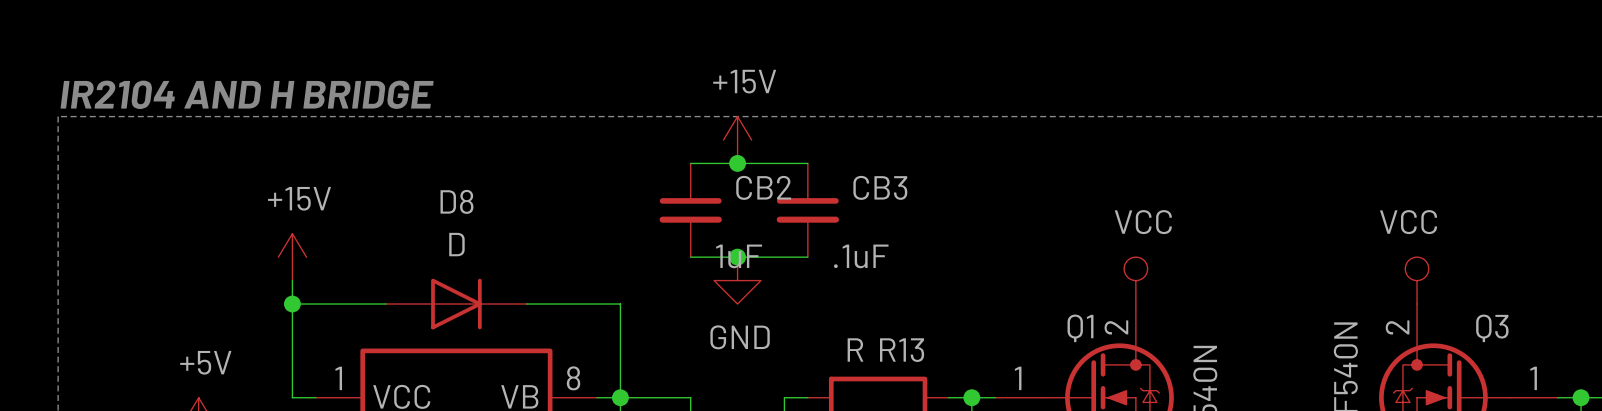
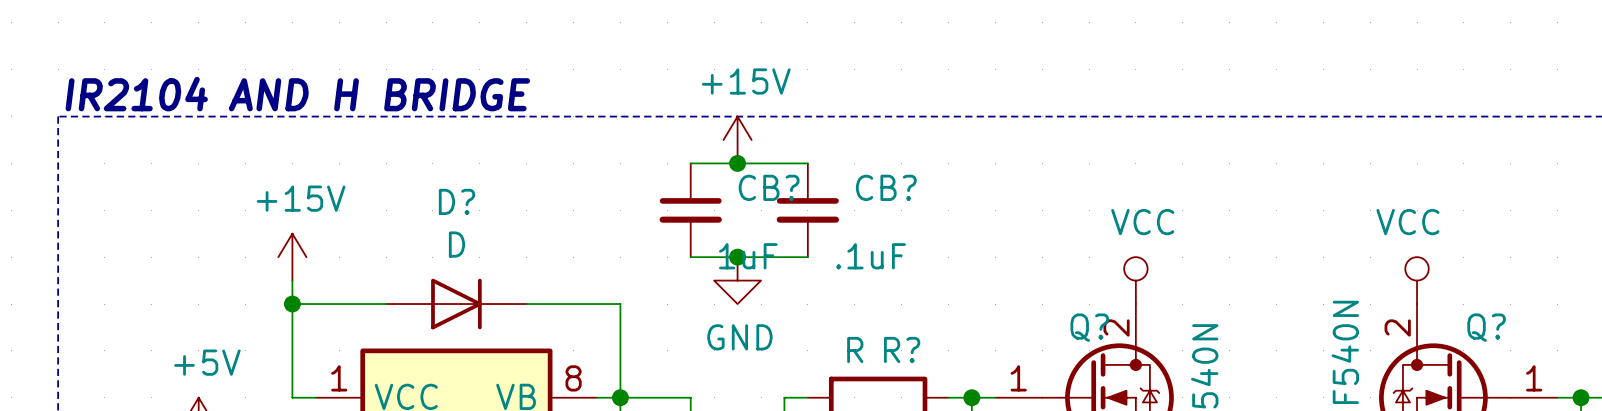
CB2 name: CB2 (763, 187) -> CB? (769, 187)
CB3 name: CB3 (880, 187) -> CB? (886, 187)
D8 name: D8 (456, 201) -> D? (456, 201)
Q1 name: Q1 (1080, 328) -> Q? (1089, 327)
Q3 name: Q3 (1492, 328) -> Q? (1486, 327)
R13 name: R13 (902, 350) -> R? (902, 349)

